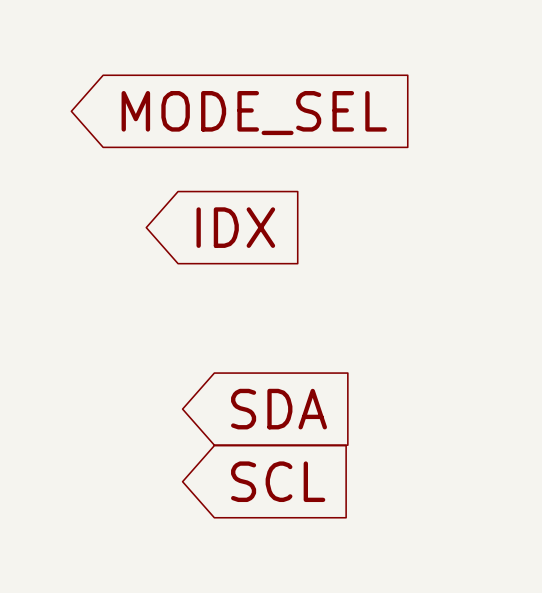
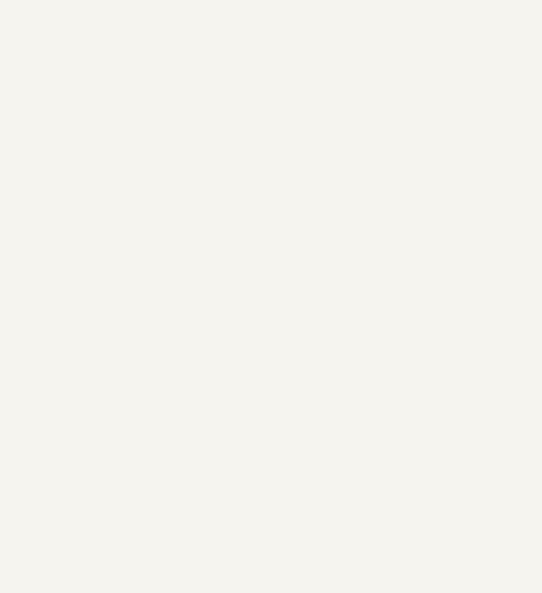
global label: MODE_SEL (254, 113) -> none
global label: IDX (235, 227) -> none
global label: SDA (279, 409) -> none
global label: SCL (278, 481) -> none

